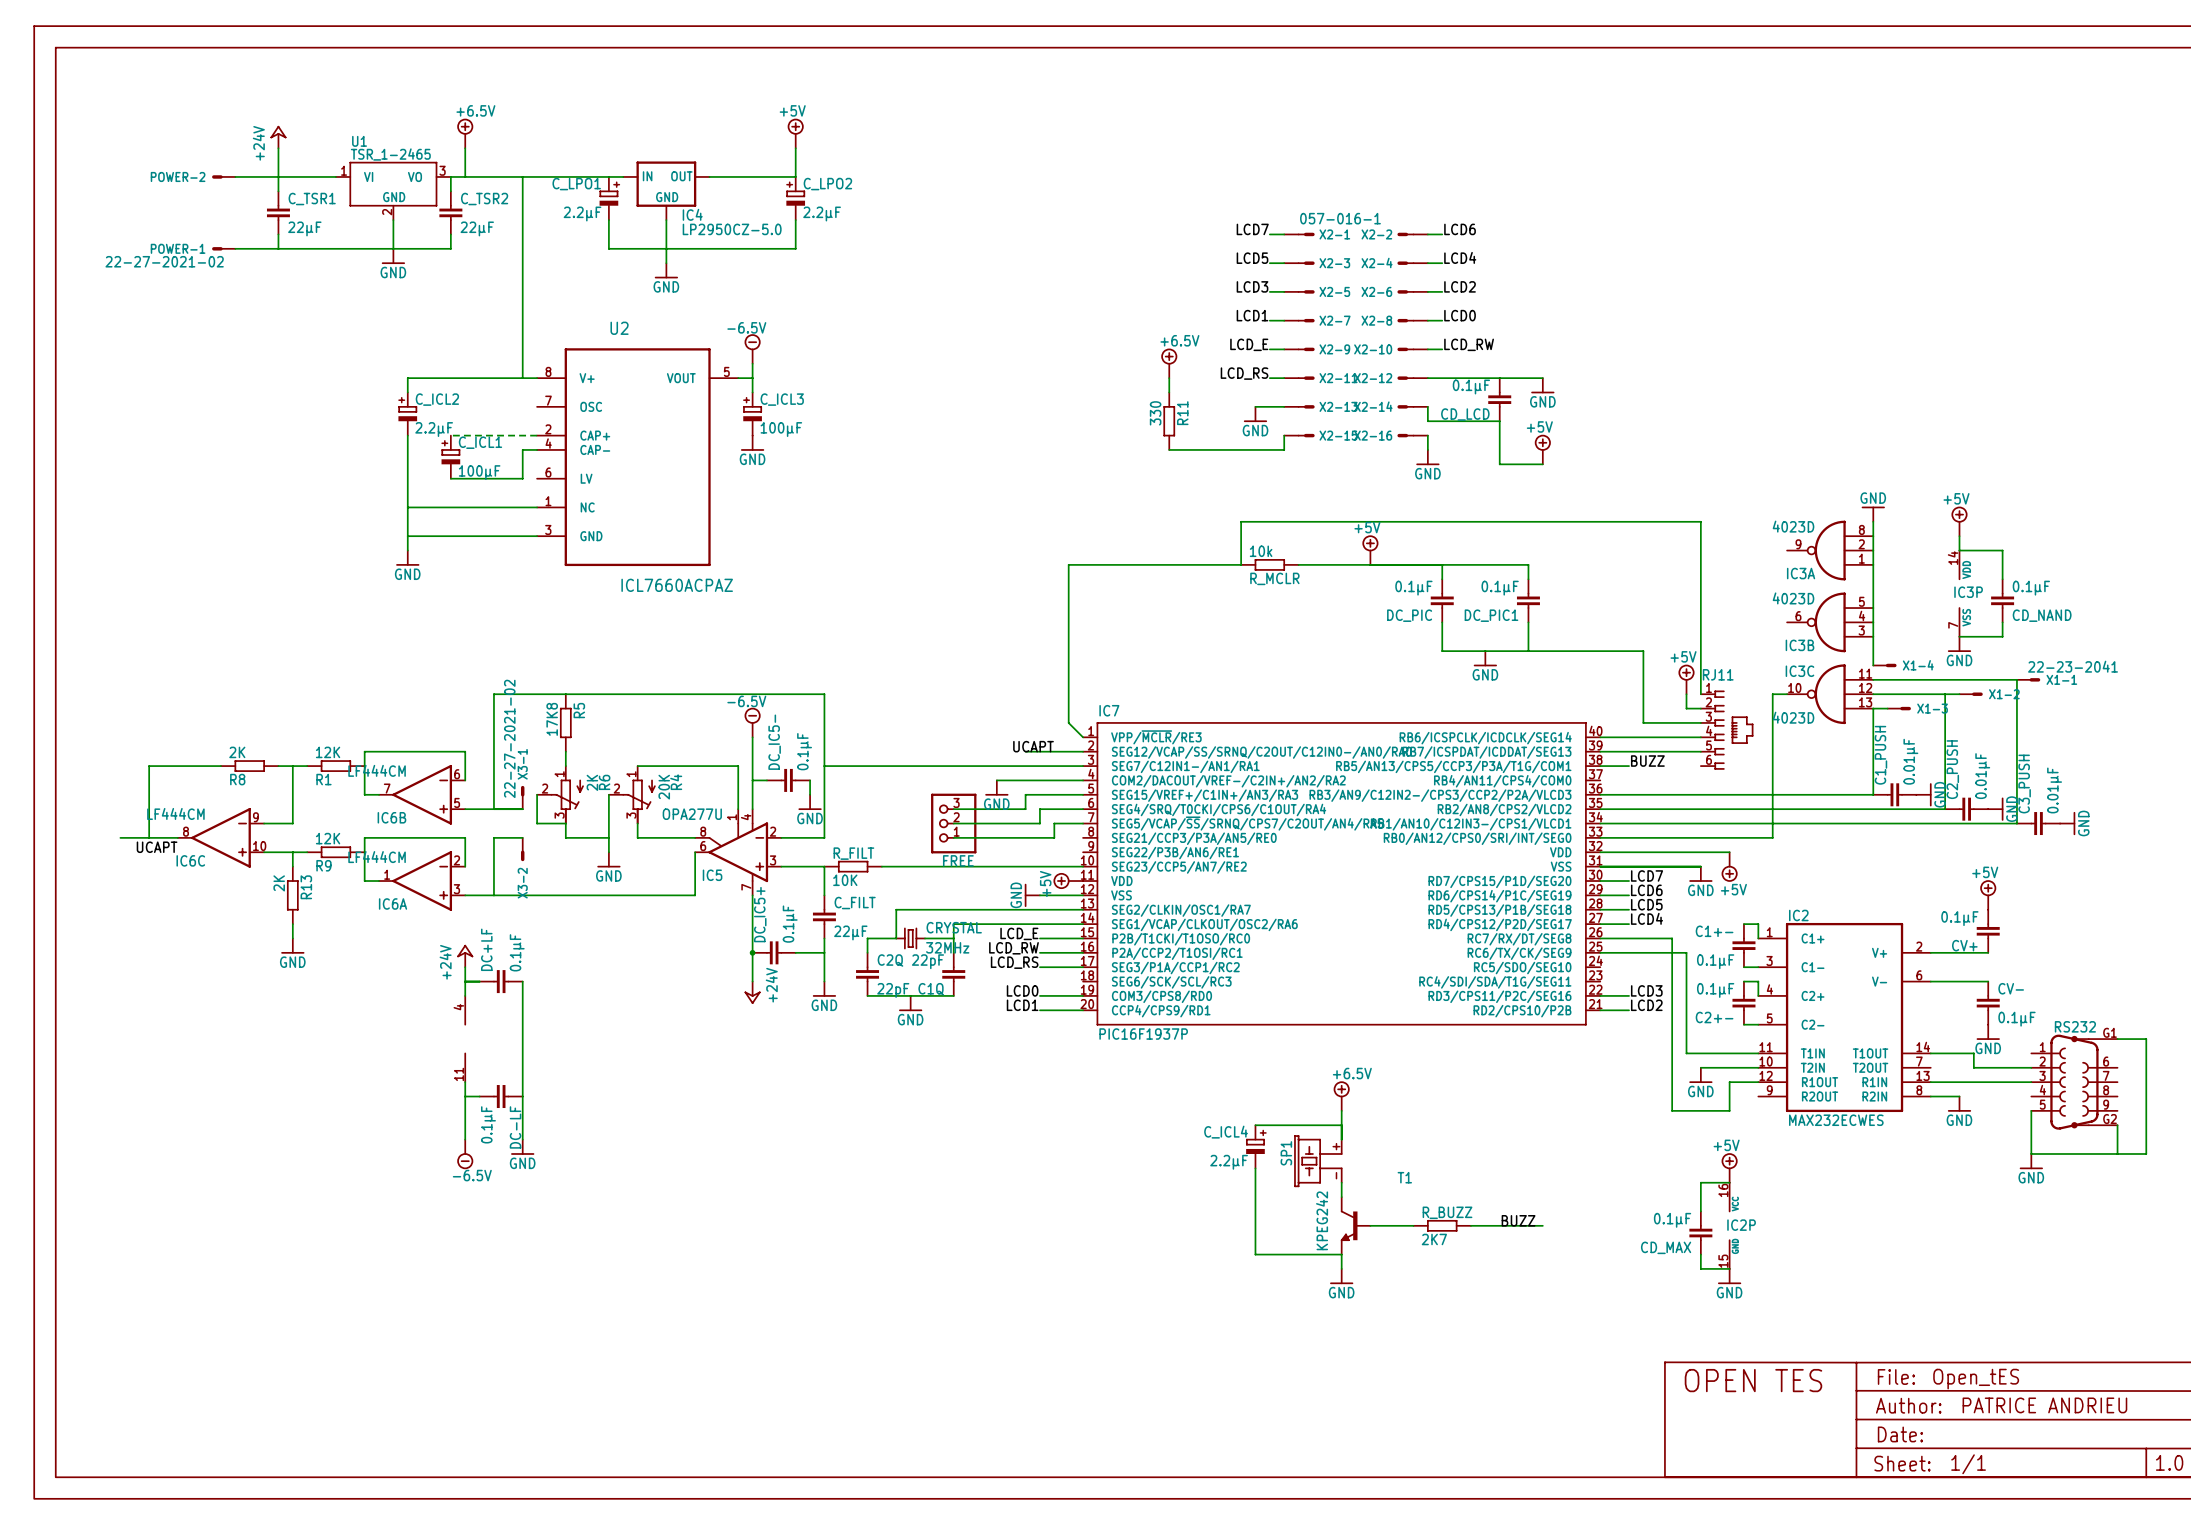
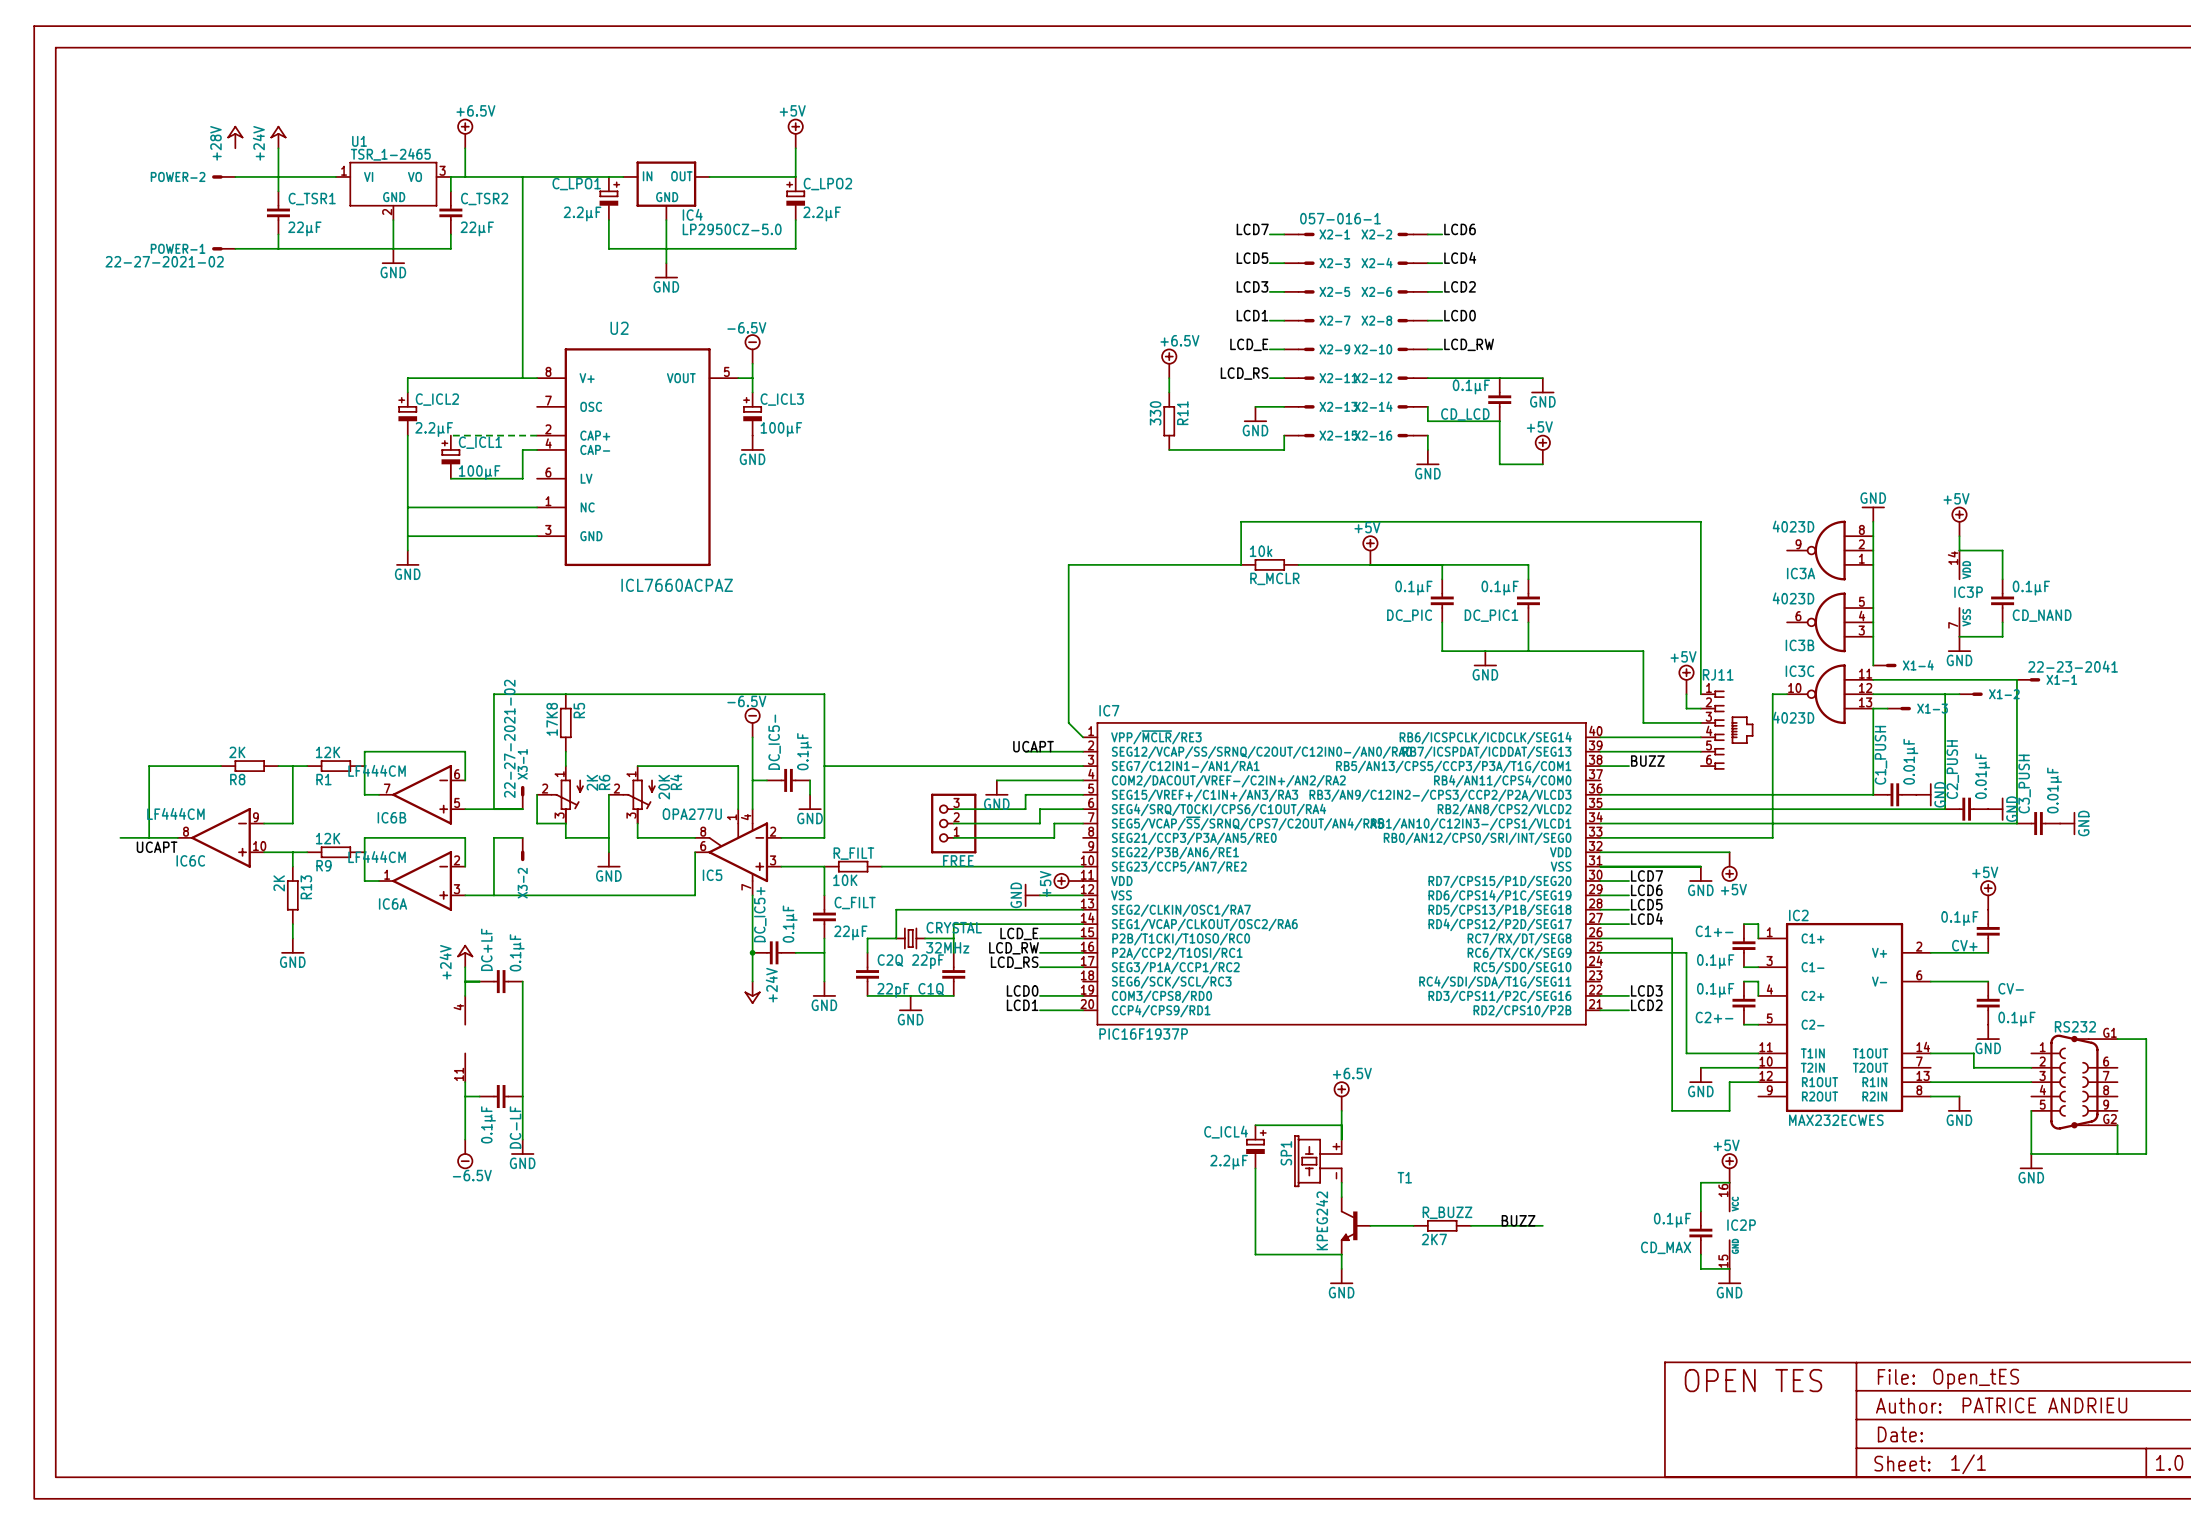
power symbol: none -> (235, 137)

